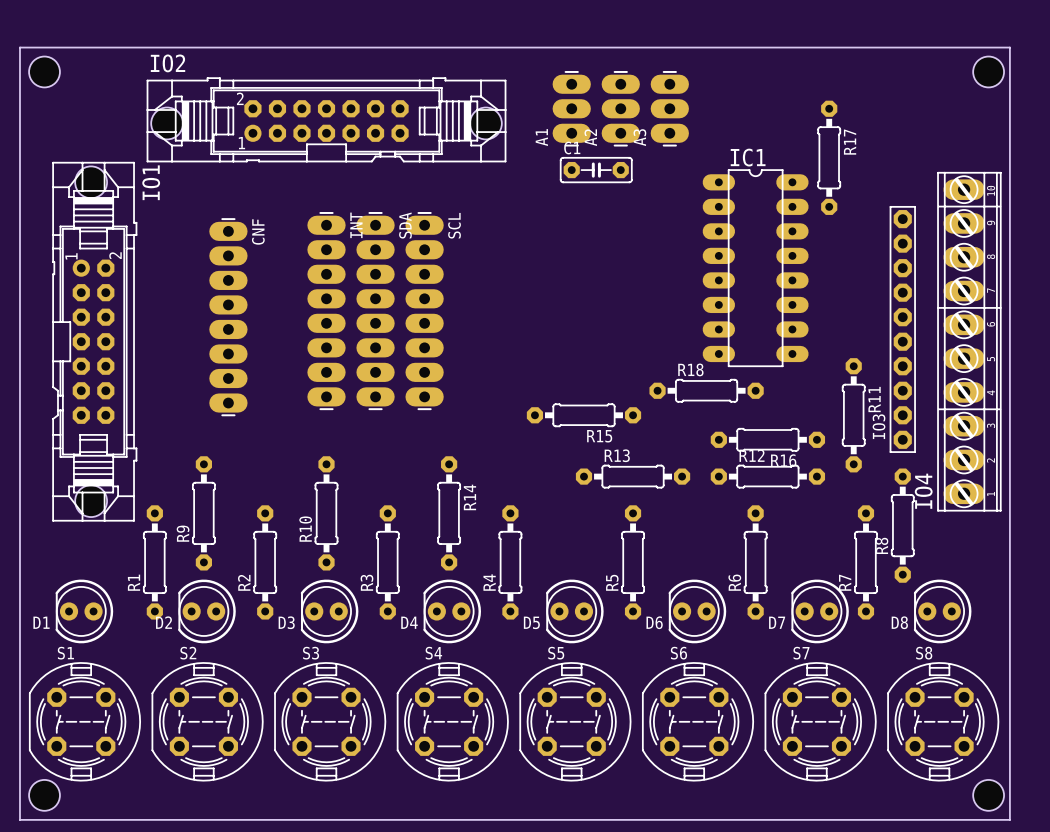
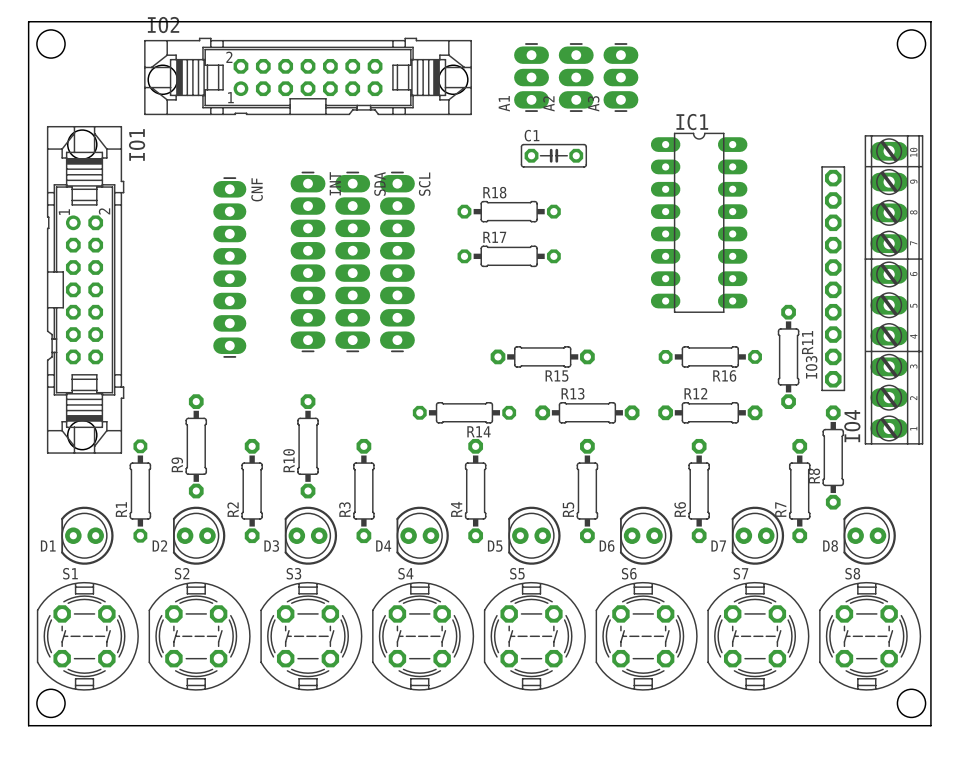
IO2 footprint: [146, 77, 507, 163] -> [144, 37, 472, 116]
R17 footprint: [817, 100, 841, 215] -> [457, 245, 561, 268]
R17 name position: R17 (850, 142) -> R17 (494, 237)
C1 footprint: [559, 157, 633, 184] -> [520, 143, 587, 168]
IO1 footprint: [52, 161, 138, 522] -> [46, 126, 125, 454]
CNF: (228, 317) -> none
CNF: none -> (229, 267)
R18 footprint: [649, 378, 764, 403] -> [457, 200, 561, 223]
R16 footprint: [710, 428, 826, 452] -> [658, 346, 762, 368]
R14 footprint: [437, 456, 461, 571] -> [412, 402, 517, 424]
R14 name position: R14 (469, 497) -> R14 (478, 431)
R1 footprint: [143, 505, 167, 620] -> [129, 439, 152, 543]

